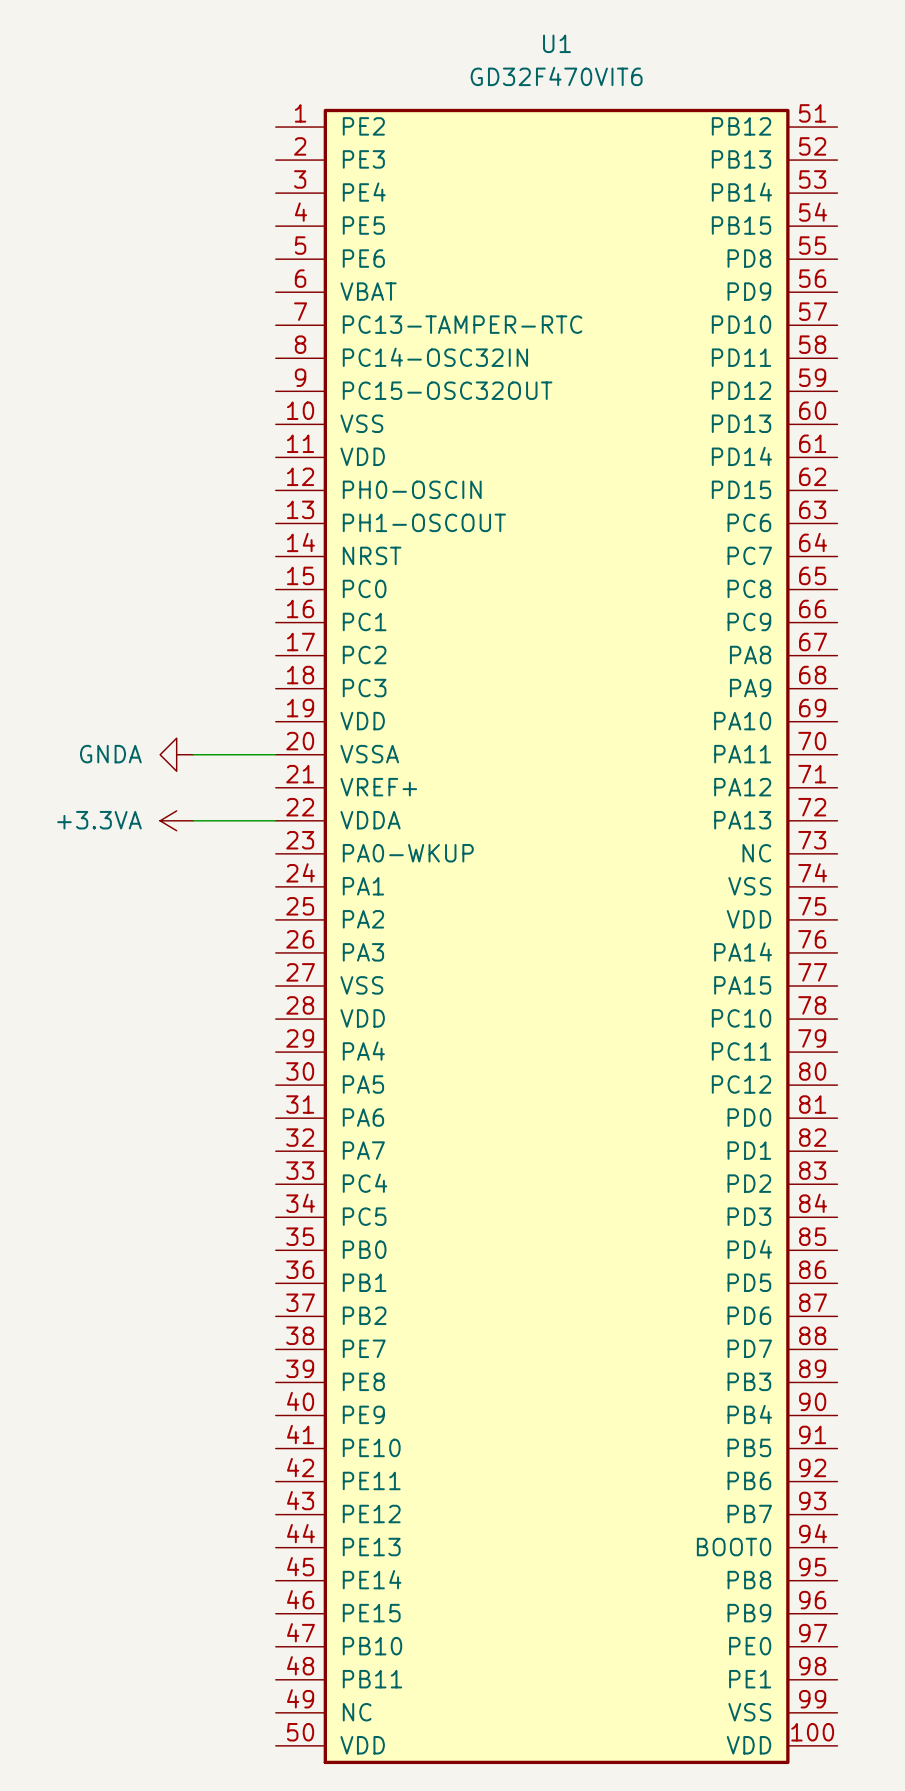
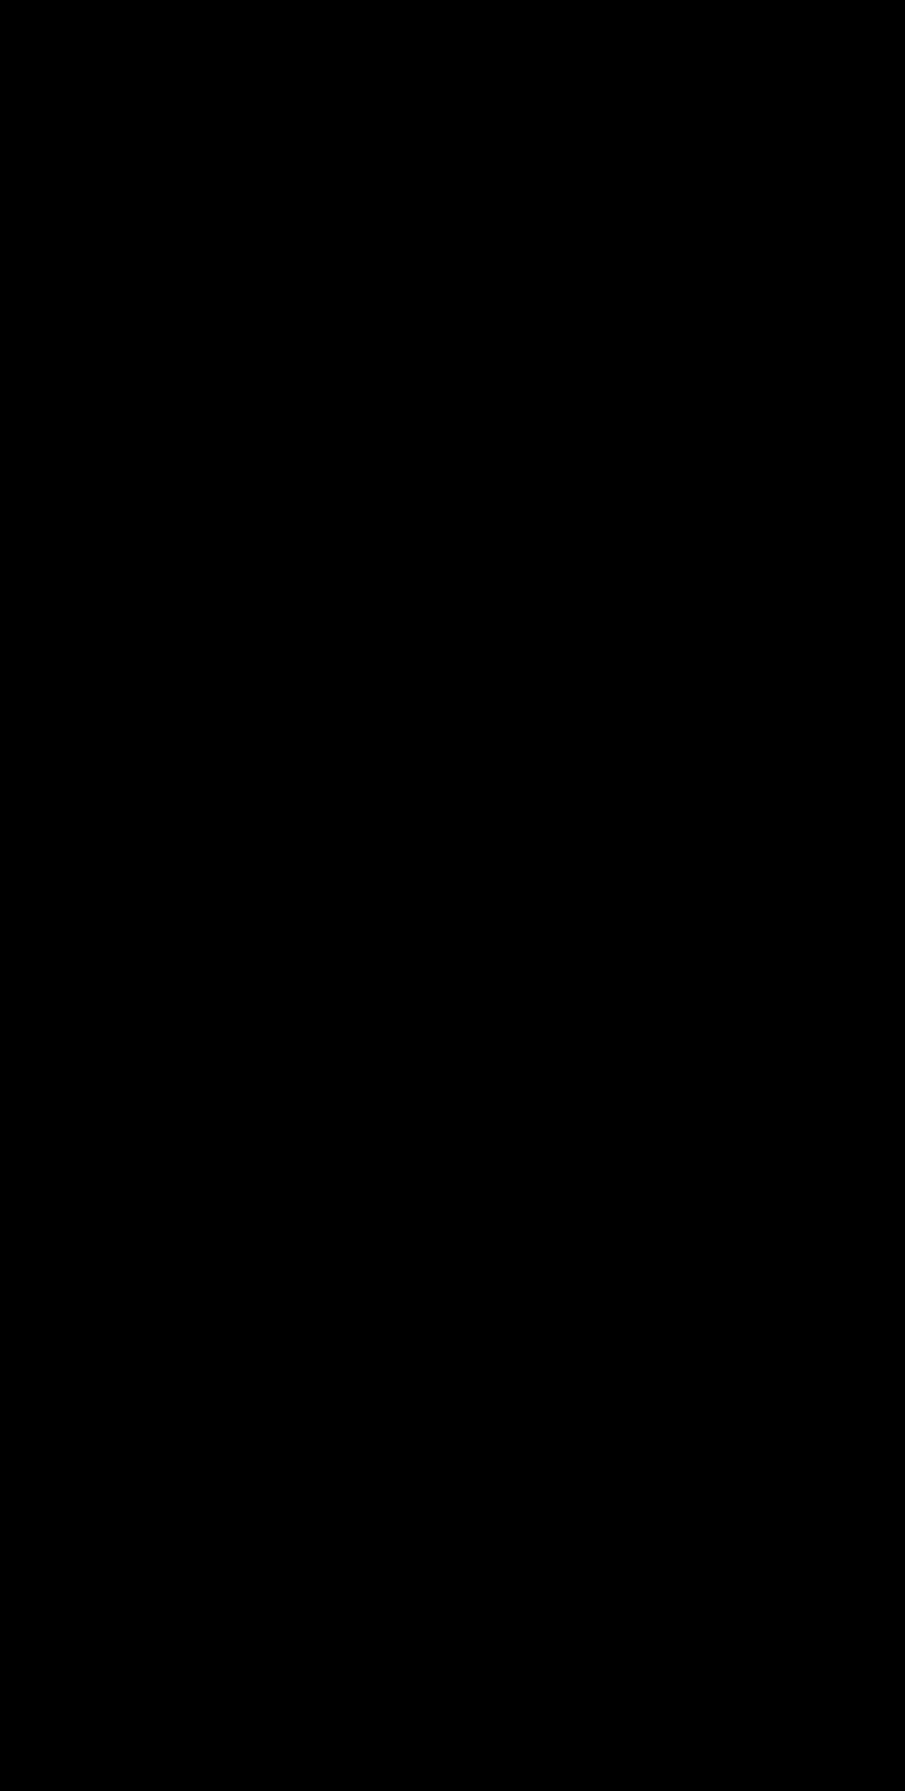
power symbol: GNDA (176, 754) -> none
wire: (193, 754) (275, 754) -> none
power symbol: +3.3VA (176, 820) -> none
wire: (193, 820) (275, 820) -> none
U1: GD32F470VIT6 (556, 936) -> none

